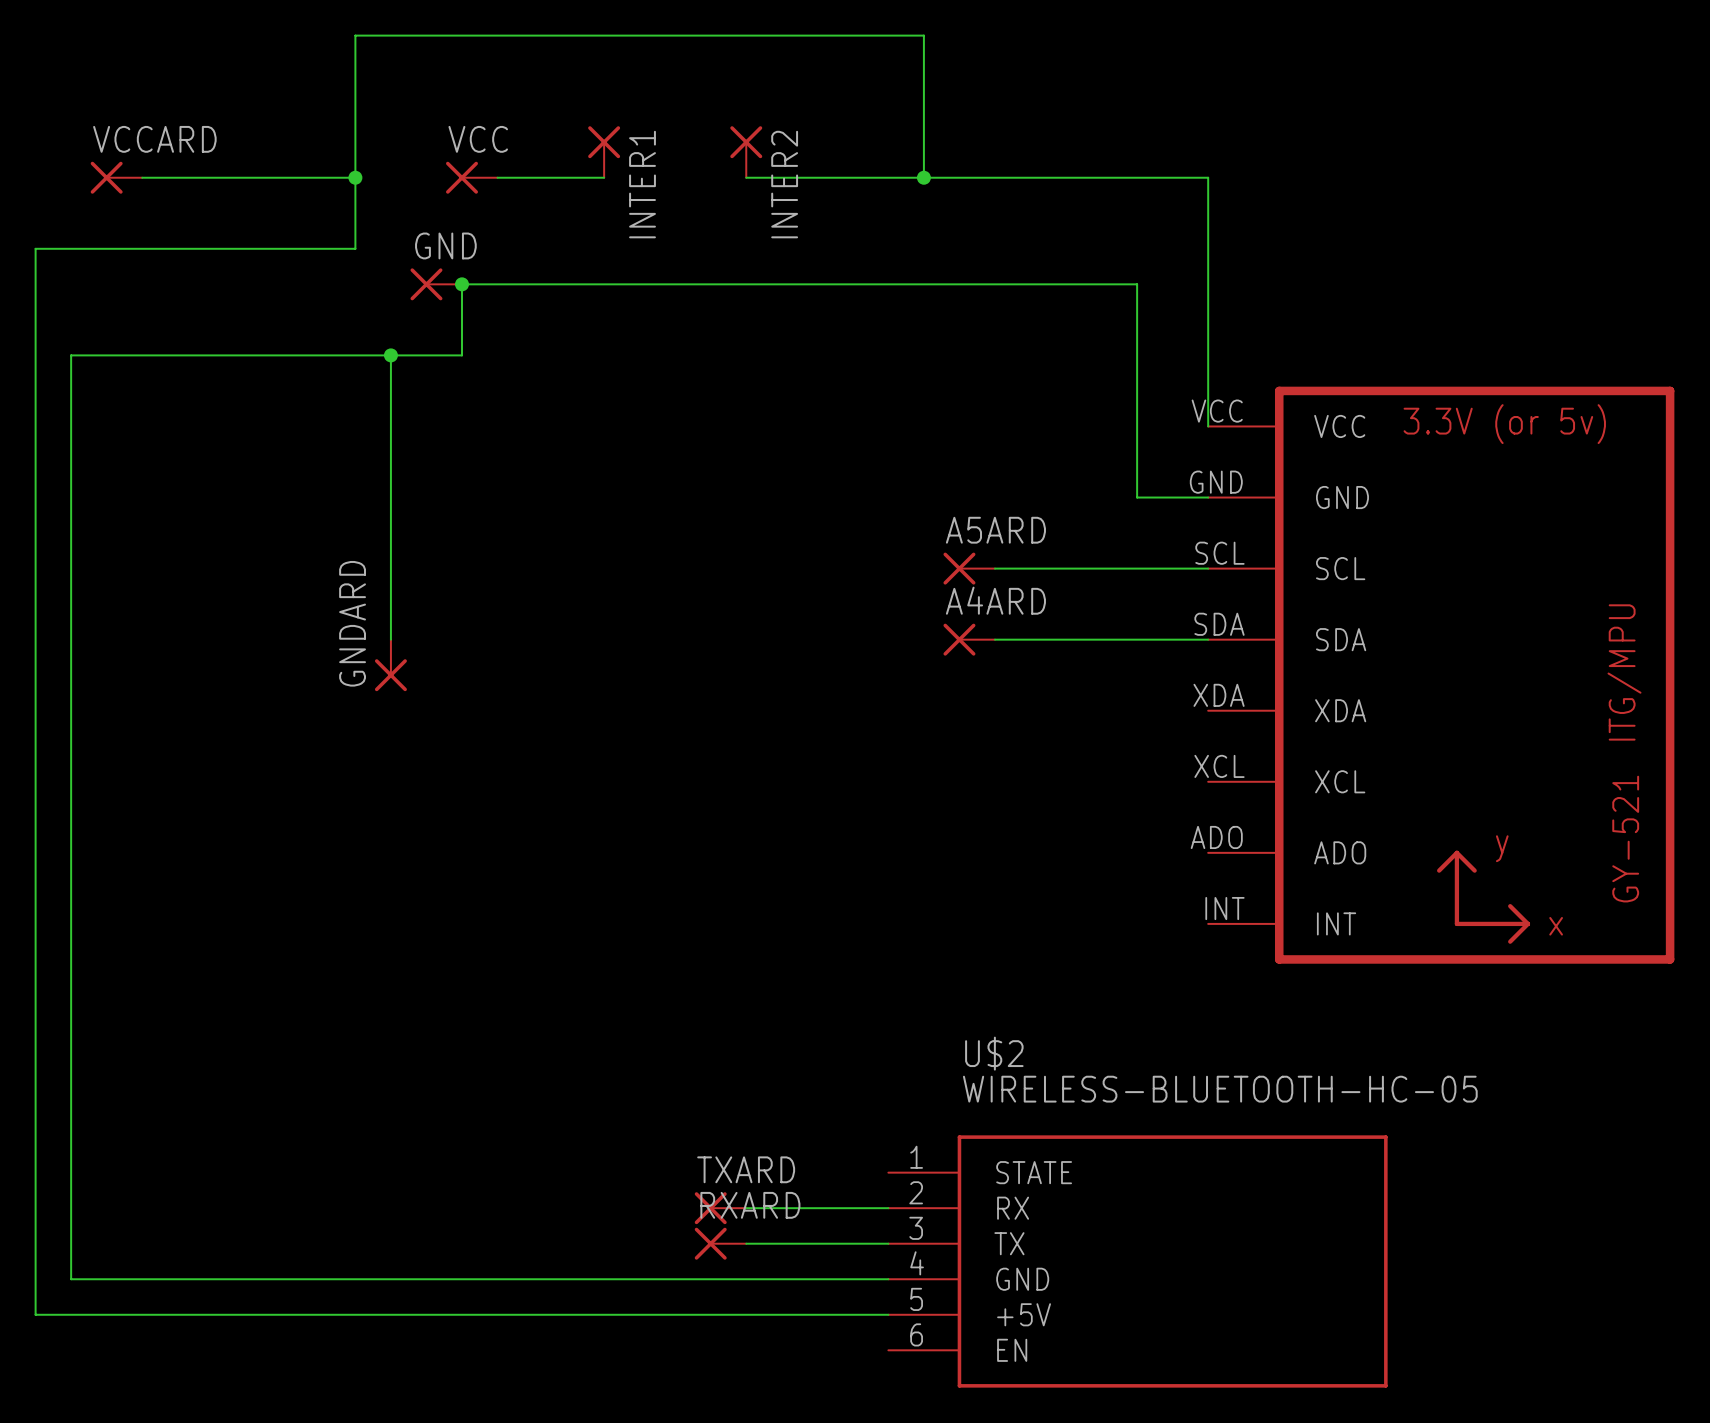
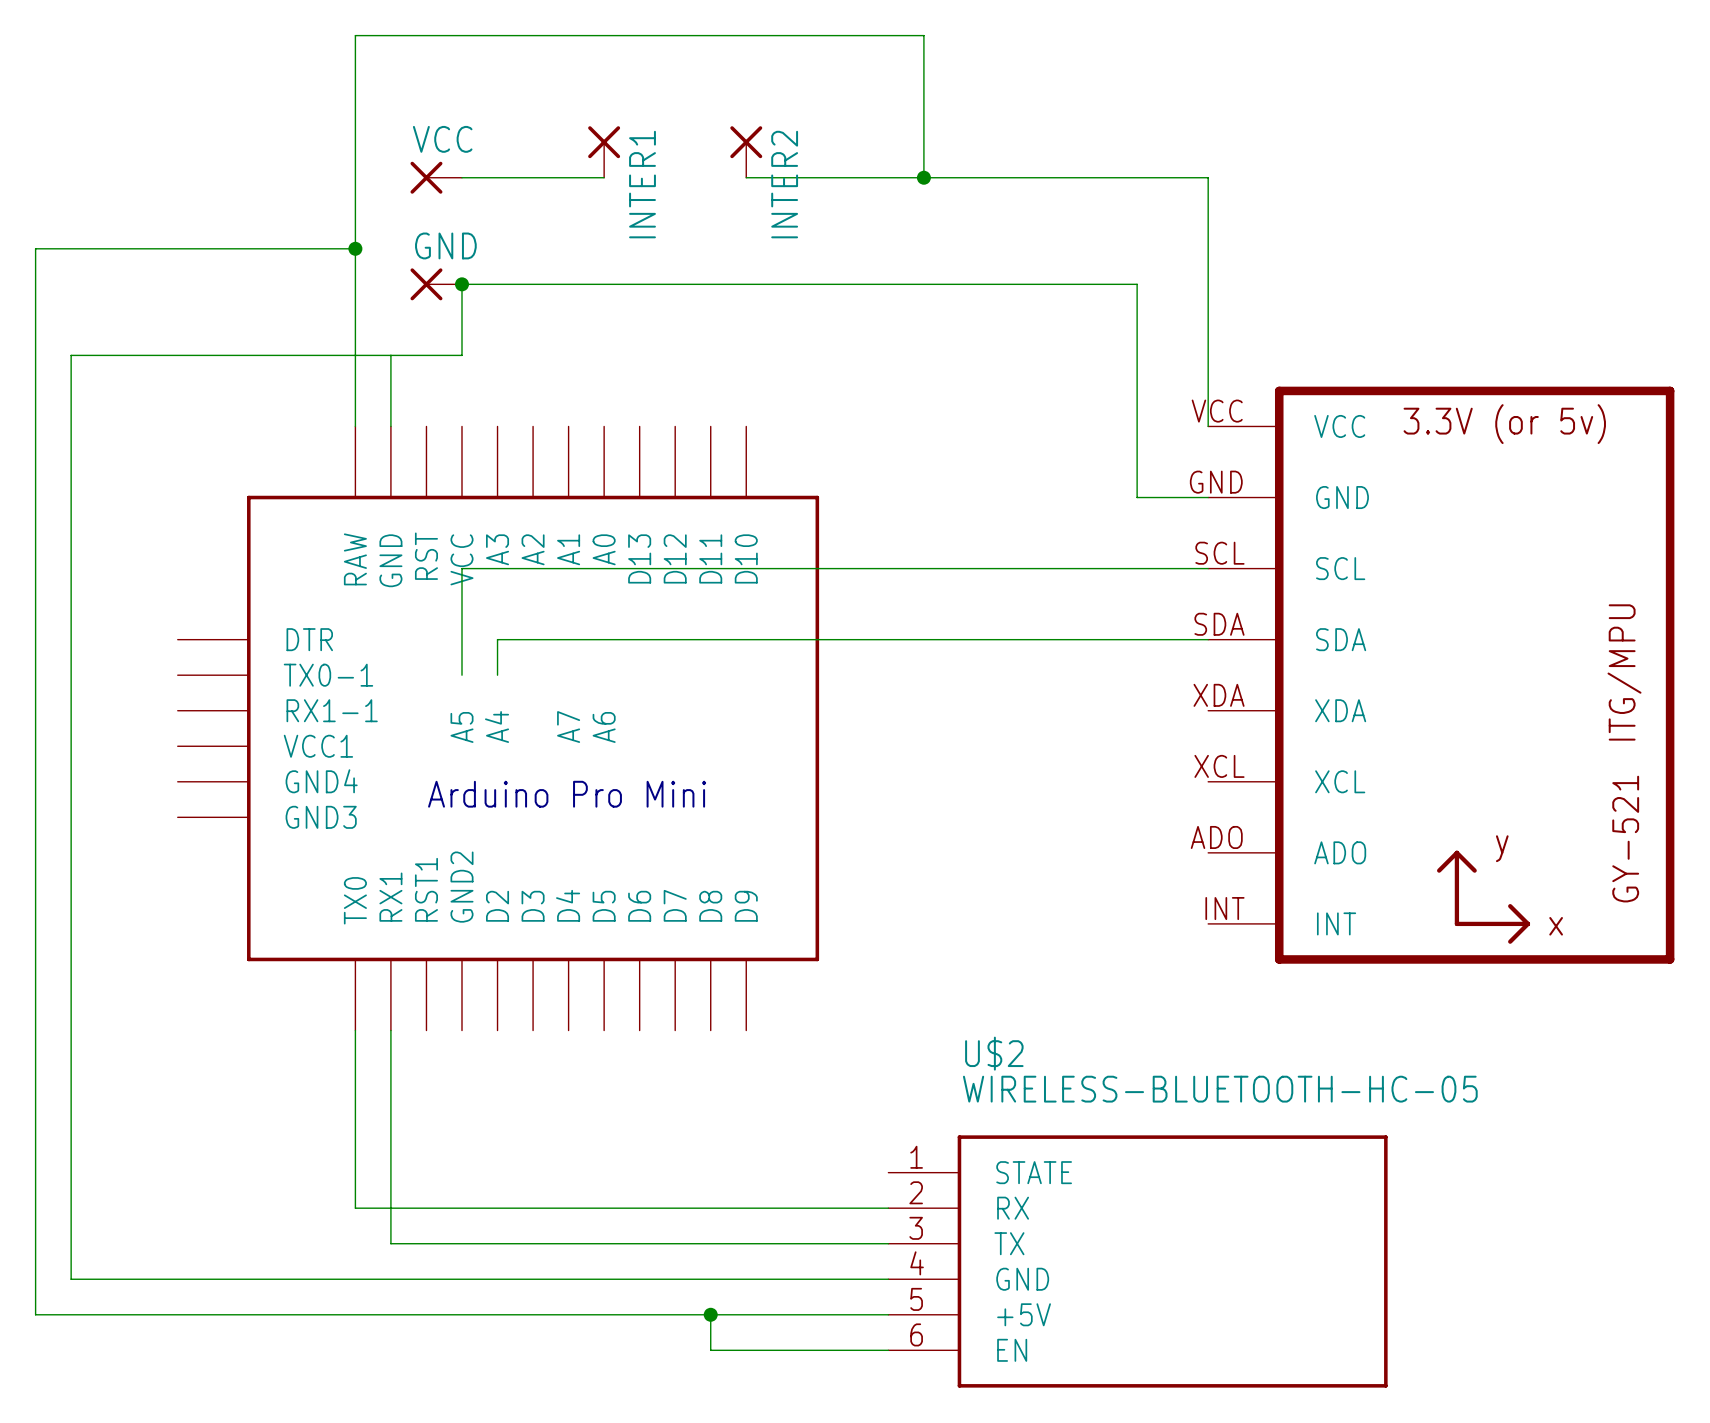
VCCARD: (116, 177) -> none
wire: (142, 177) (355, 177) -> none
junction: (355, 177) -> none
VCC position: (471, 177) -> (436, 177)
wire: none -> (355, 248) (355, 426)
junction: none -> (355, 248)
junction: (390, 355) -> none
wire: (390, 426) (390, 639) -> none
A5ARD: (969, 568) -> none
wire: none -> (994, 568) (461, 568) (461, 675)
A4ARD: (969, 639) -> none
wire: none -> (994, 639) (497, 639) (497, 675)
GNDARD: (390, 665) -> none
part: none -> (498, 728)
wire: none -> (355, 1030) (355, 1208) (746, 1208)
wire: none -> (390, 1030) (390, 1243) (746, 1243)
TXARD: (720, 1208) -> none
RXARD: (720, 1243) -> none
wire: none -> (710, 1314) (710, 1350) (888, 1350)
junction: none -> (710, 1314)

